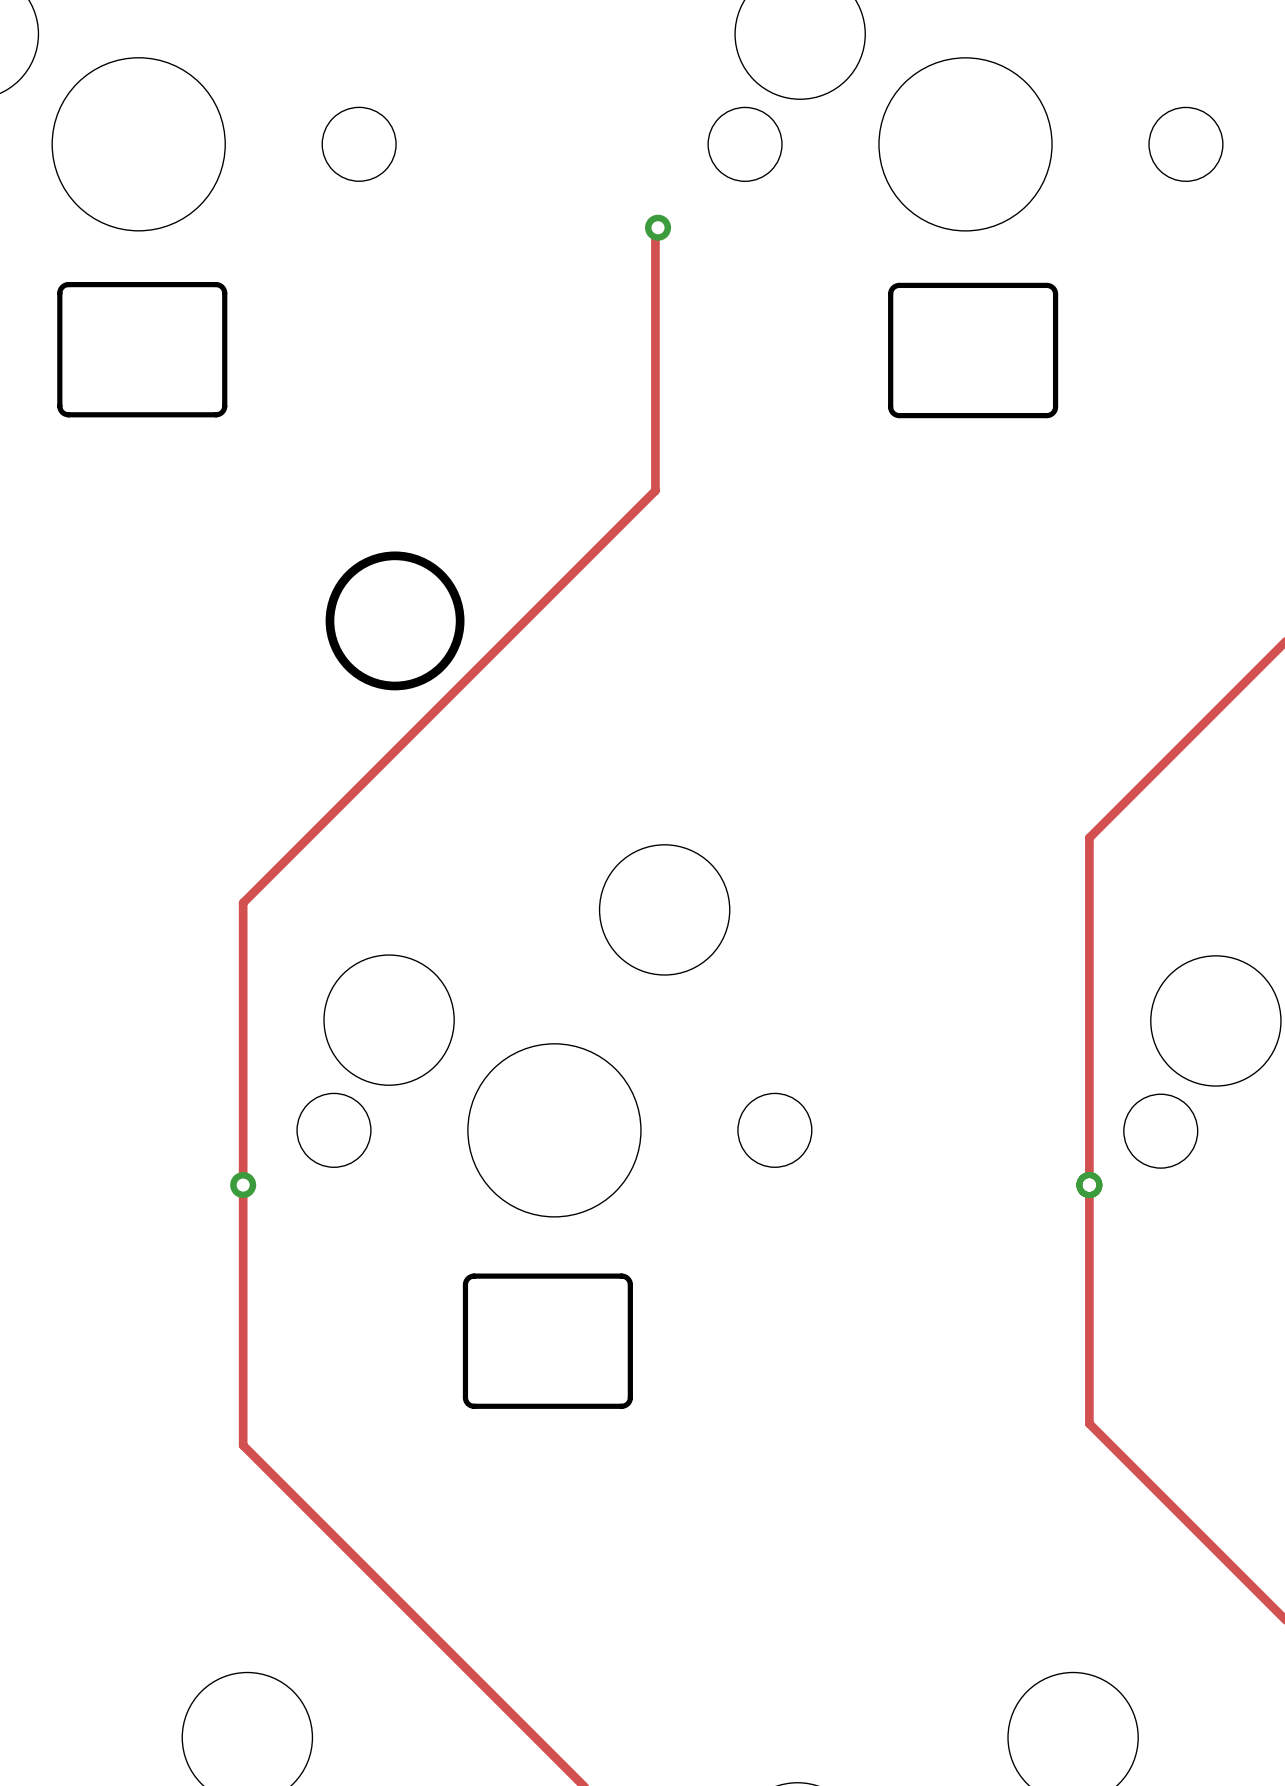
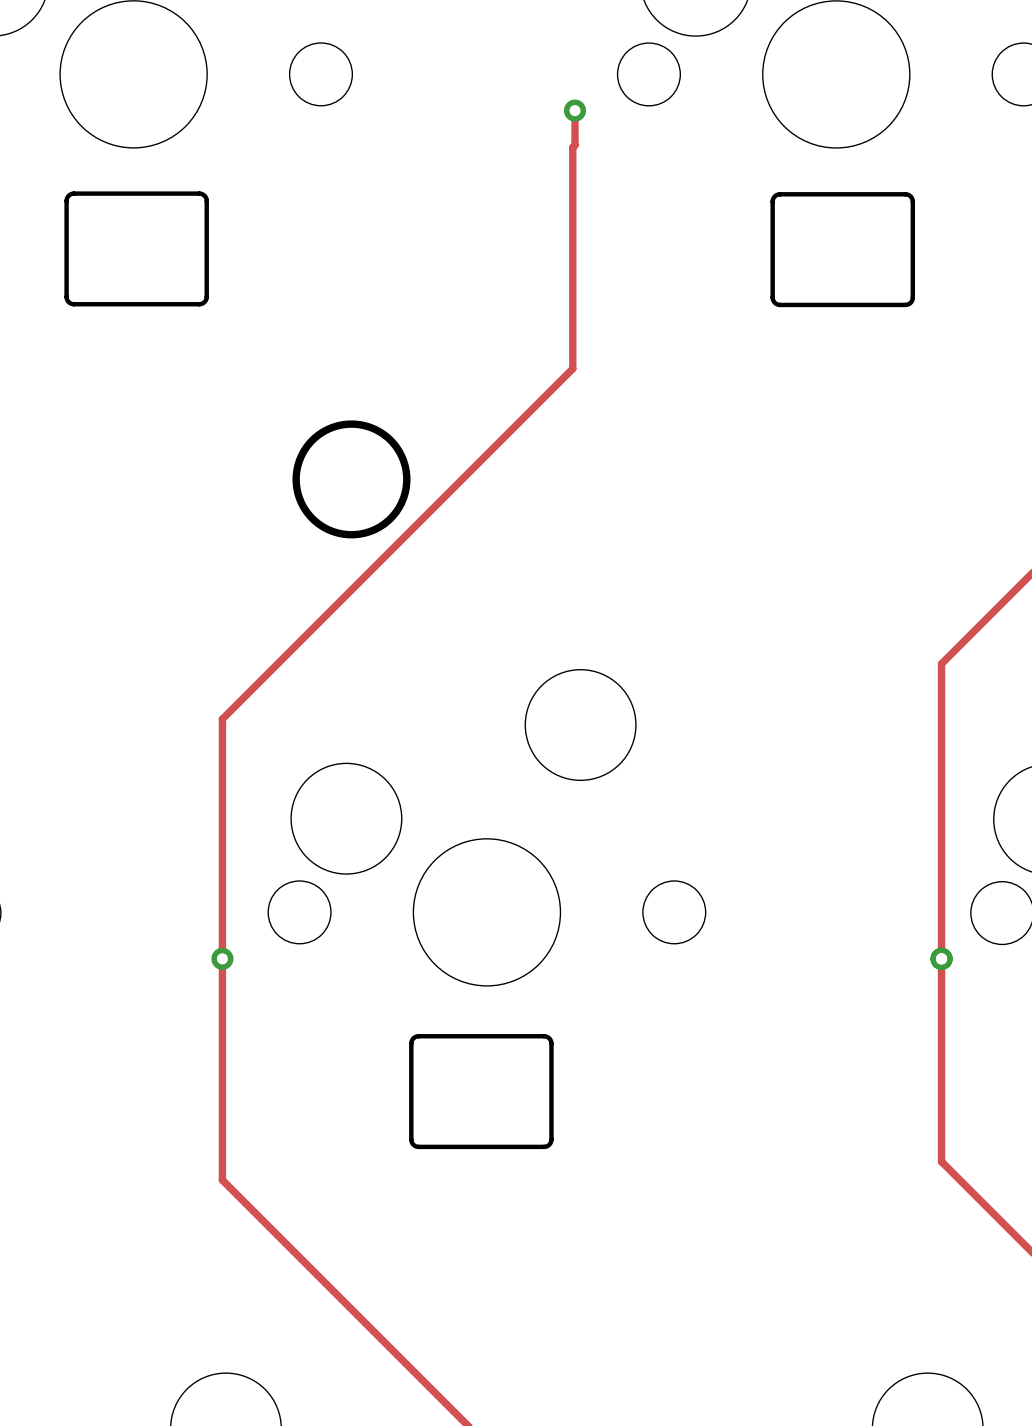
track: none -> (574, 110) (574, 145)
via position: (658, 227) -> (574, 110)

